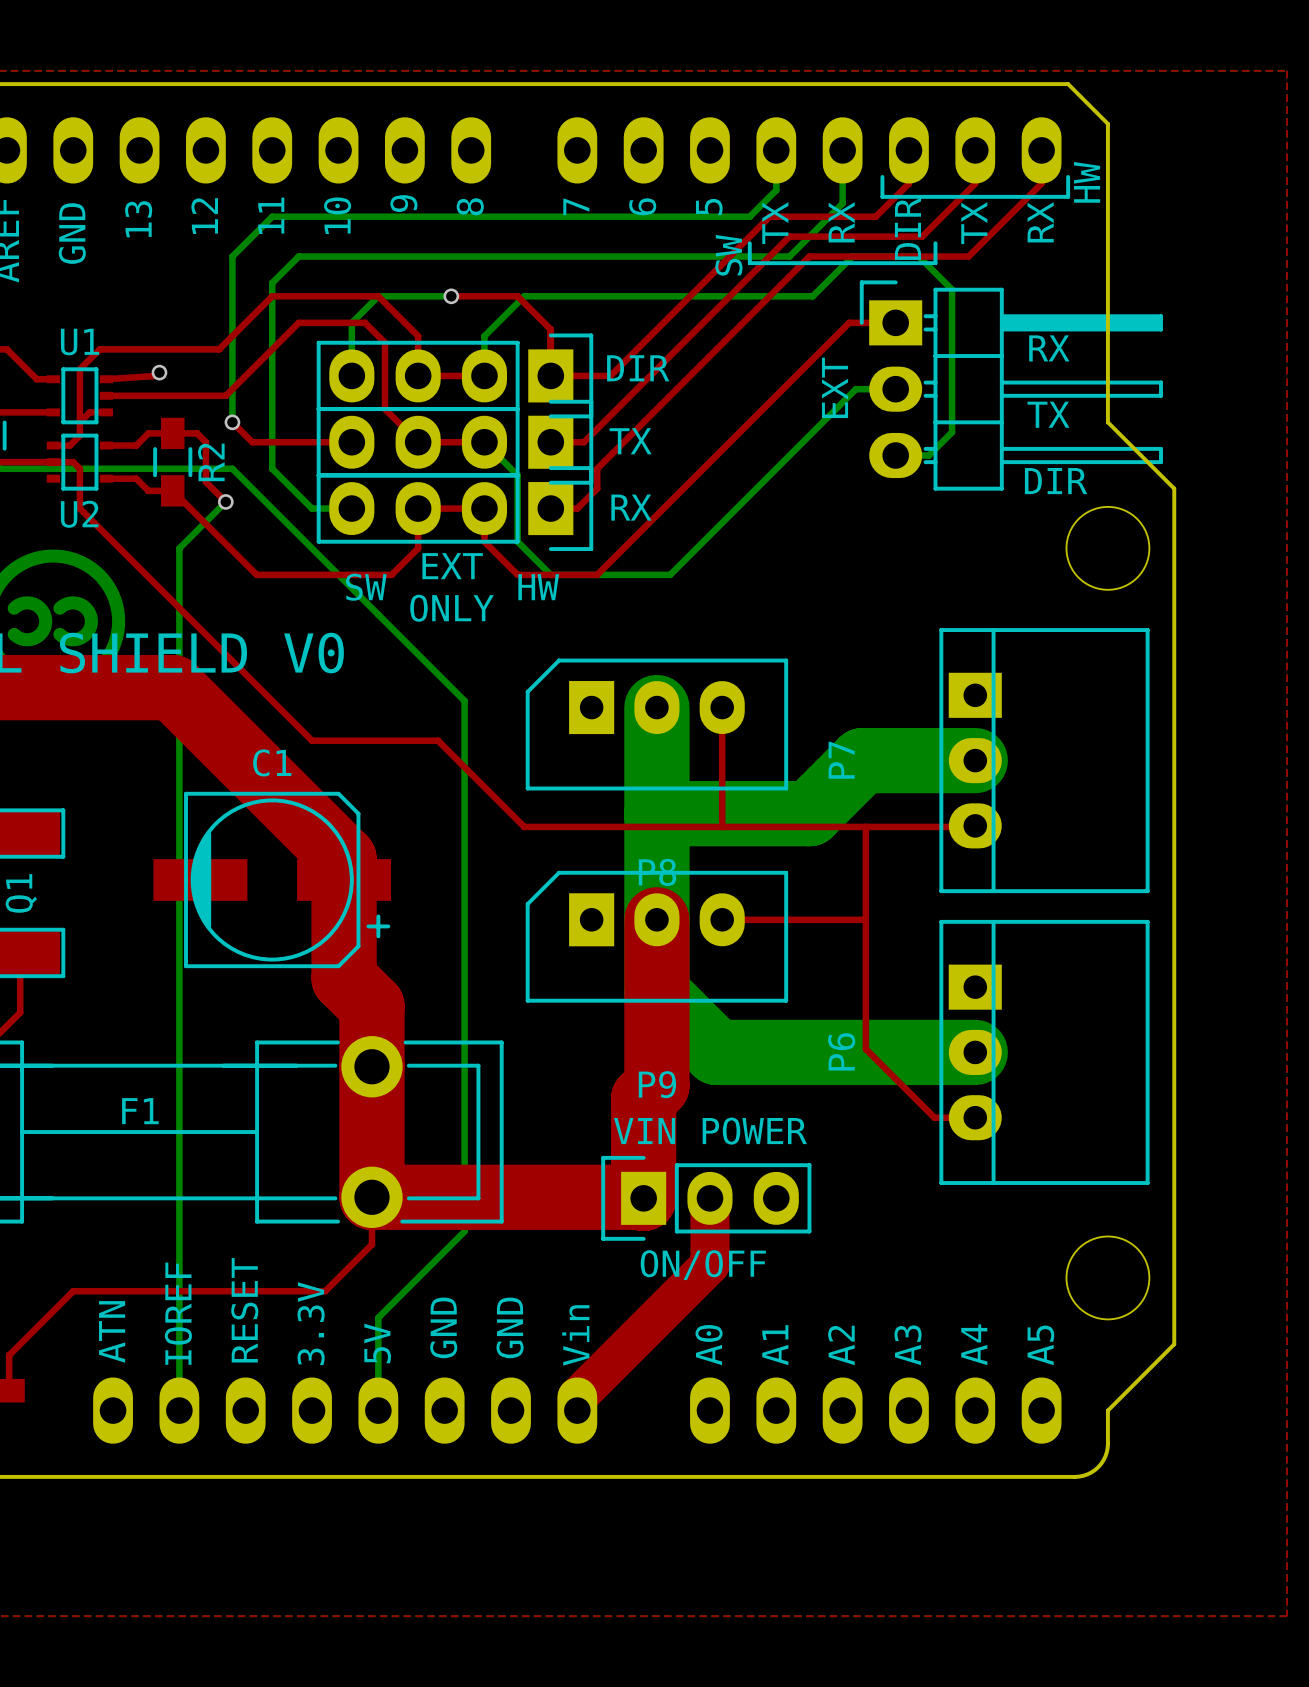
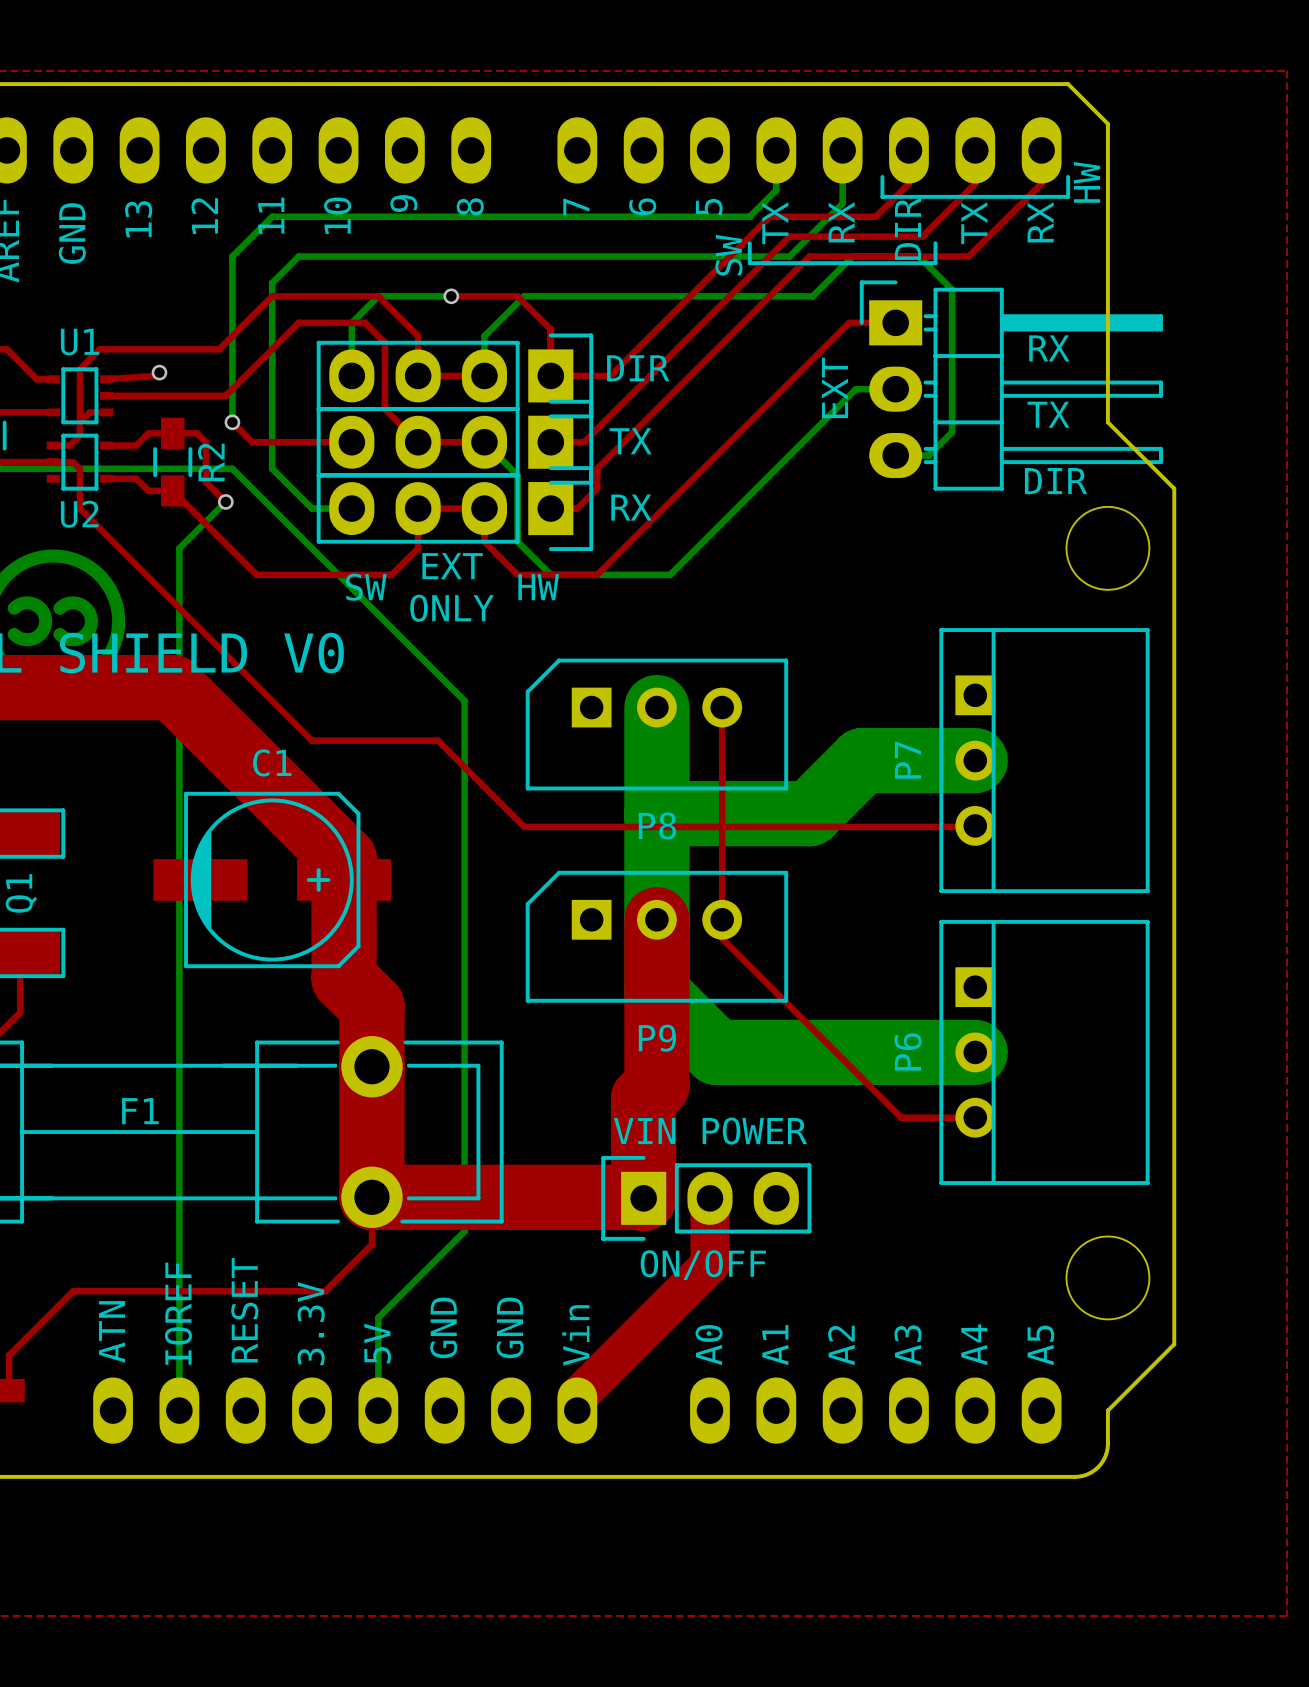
P7 footprint: [939, 628, 1150, 894] -> [939, 628, 1150, 894]
P8 footprint: [525, 658, 789, 791] -> [525, 658, 789, 791]
P7 name position: P7 (841, 760) -> P7 (907, 760)
C1 footprint: [153, 791, 392, 969] -> [153, 791, 392, 969]
top track: (865, 826) (865, 1049) (934, 1117) -> (722, 826) (722, 938) (901, 1117) (934, 1117)
P9 footprint: [525, 870, 789, 1003] -> [525, 870, 789, 1003]
top track: (722, 919) (865, 919) -> none
P6 footprint: [939, 919, 1150, 1185] -> [939, 919, 1150, 1185]
P6 name position: P6 (841, 1051) -> P6 (908, 1051)

